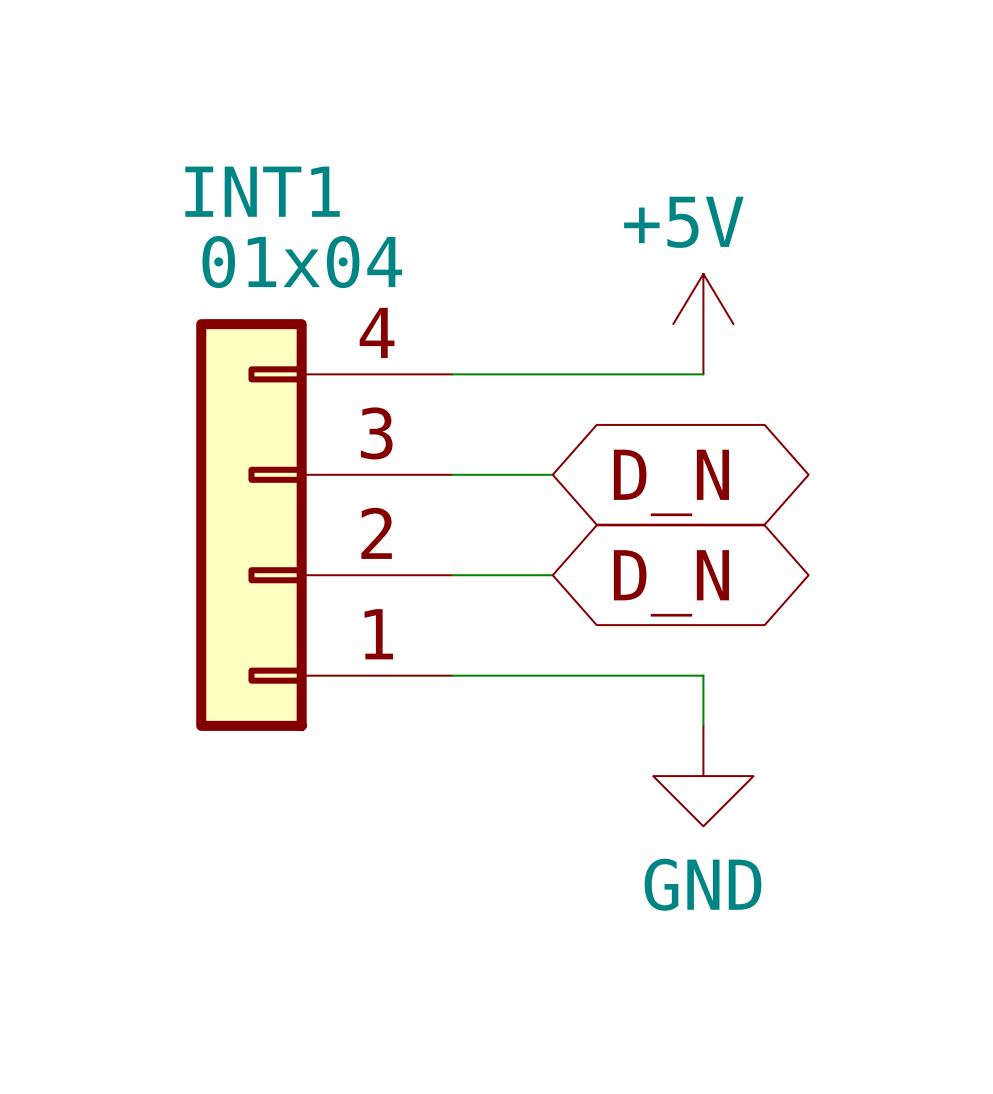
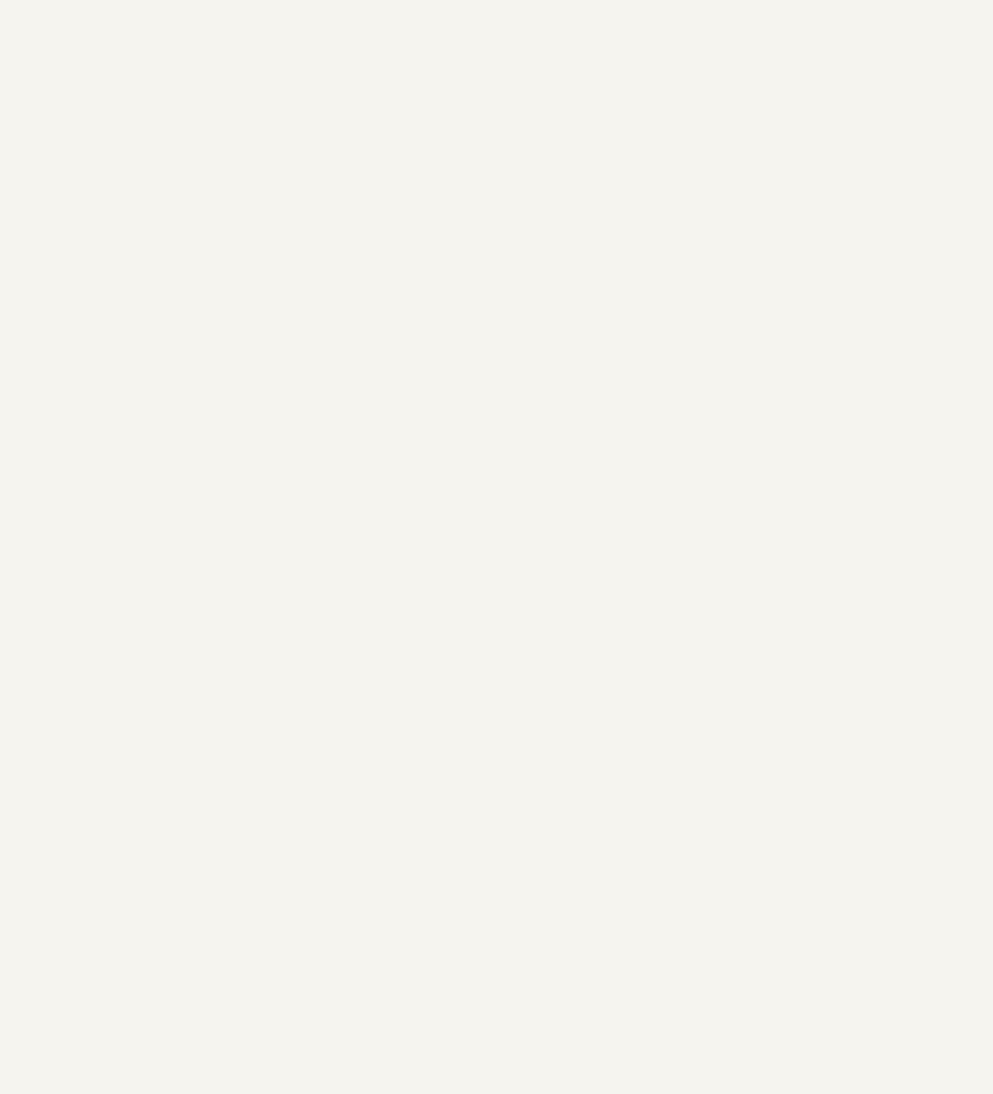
power symbol: +5V (703, 324) -> none
wire: (452, 374) (703, 374) -> none
wire: (452, 474) (552, 474) -> none
global label: D_N (671, 482) -> none
INT1: 01x04 (324, 525) -> none
wire: (452, 575) (552, 575) -> none
global label: D_N (671, 583) -> none
wire: (452, 675) (703, 675) (703, 725) -> none
power symbol: GND (703, 776) -> none

